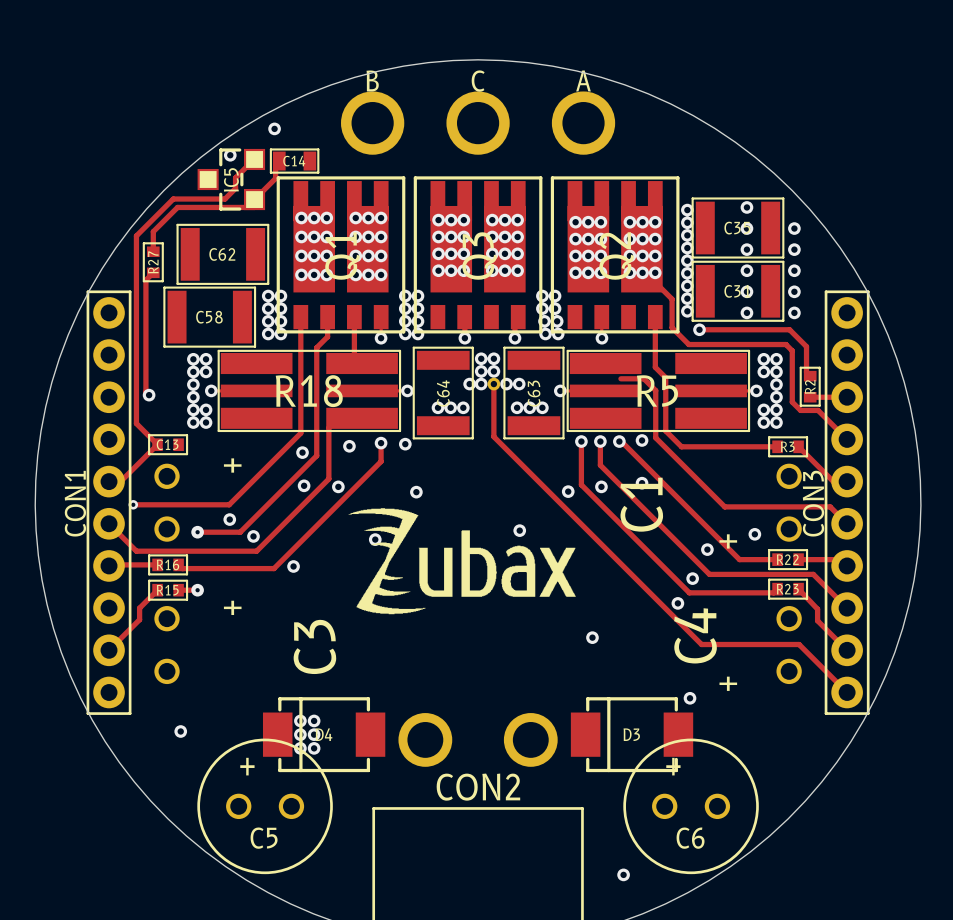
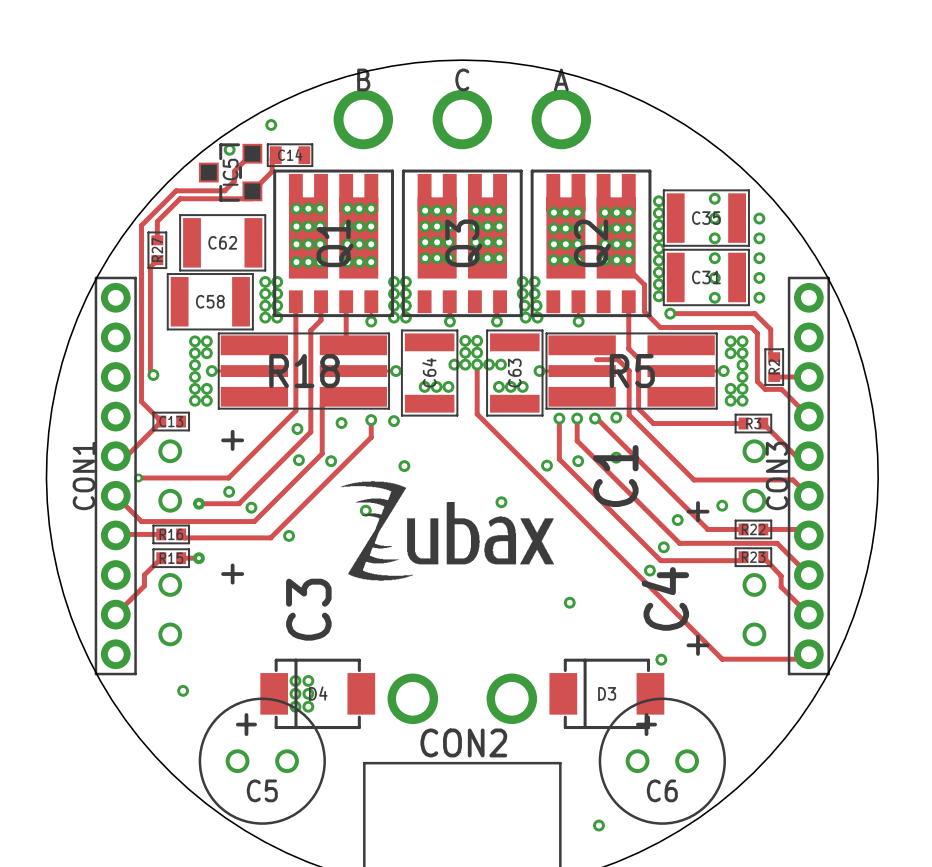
track: (701, 644) (799, 644) (847, 692) -> (672, 609) (722, 659) (803, 659) (808, 654)

